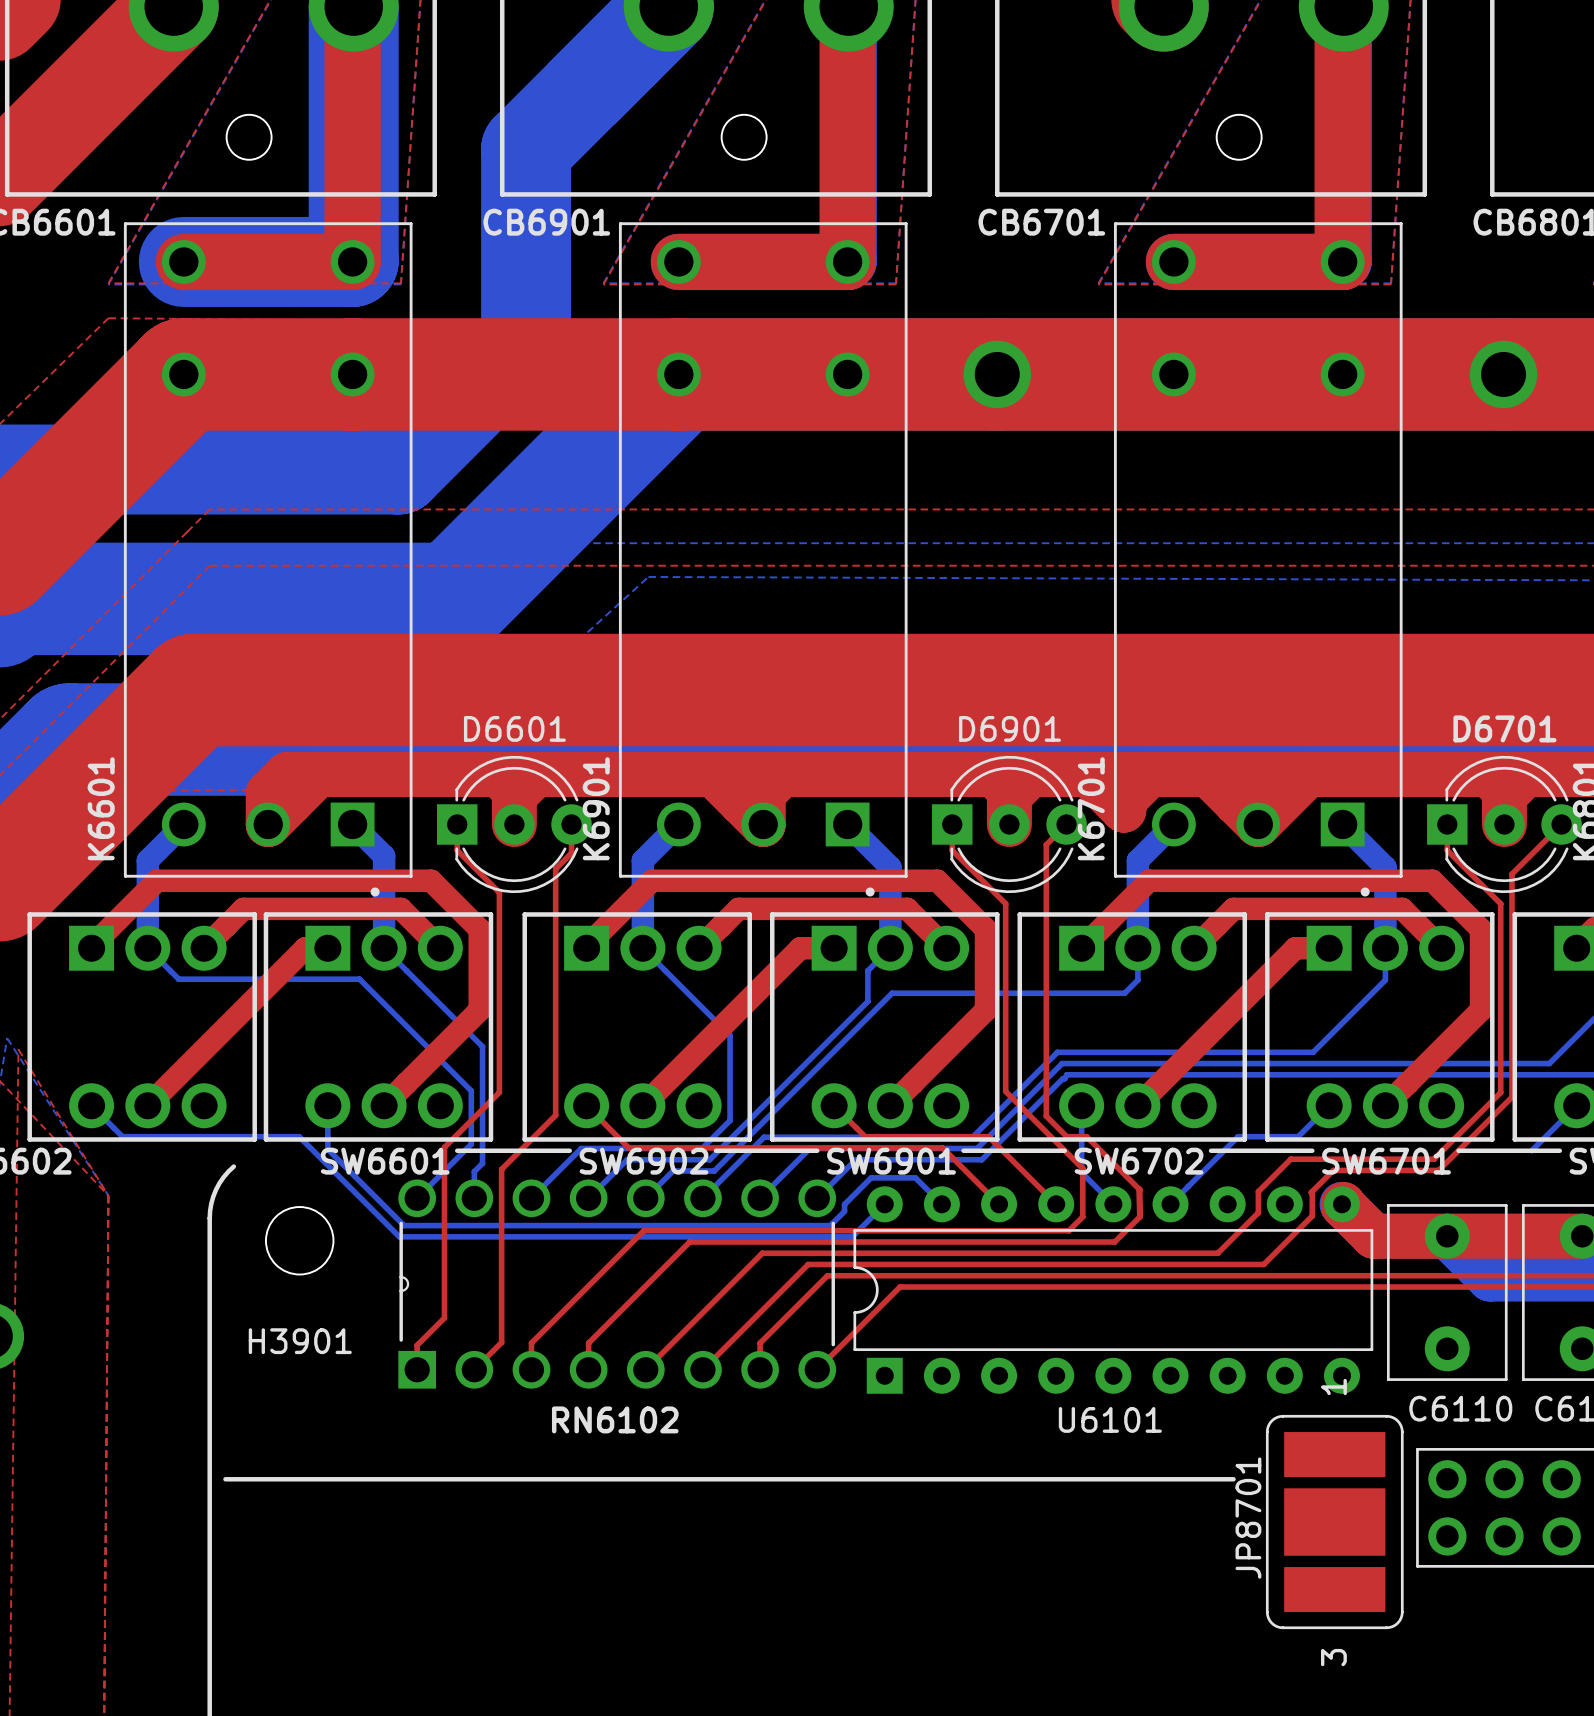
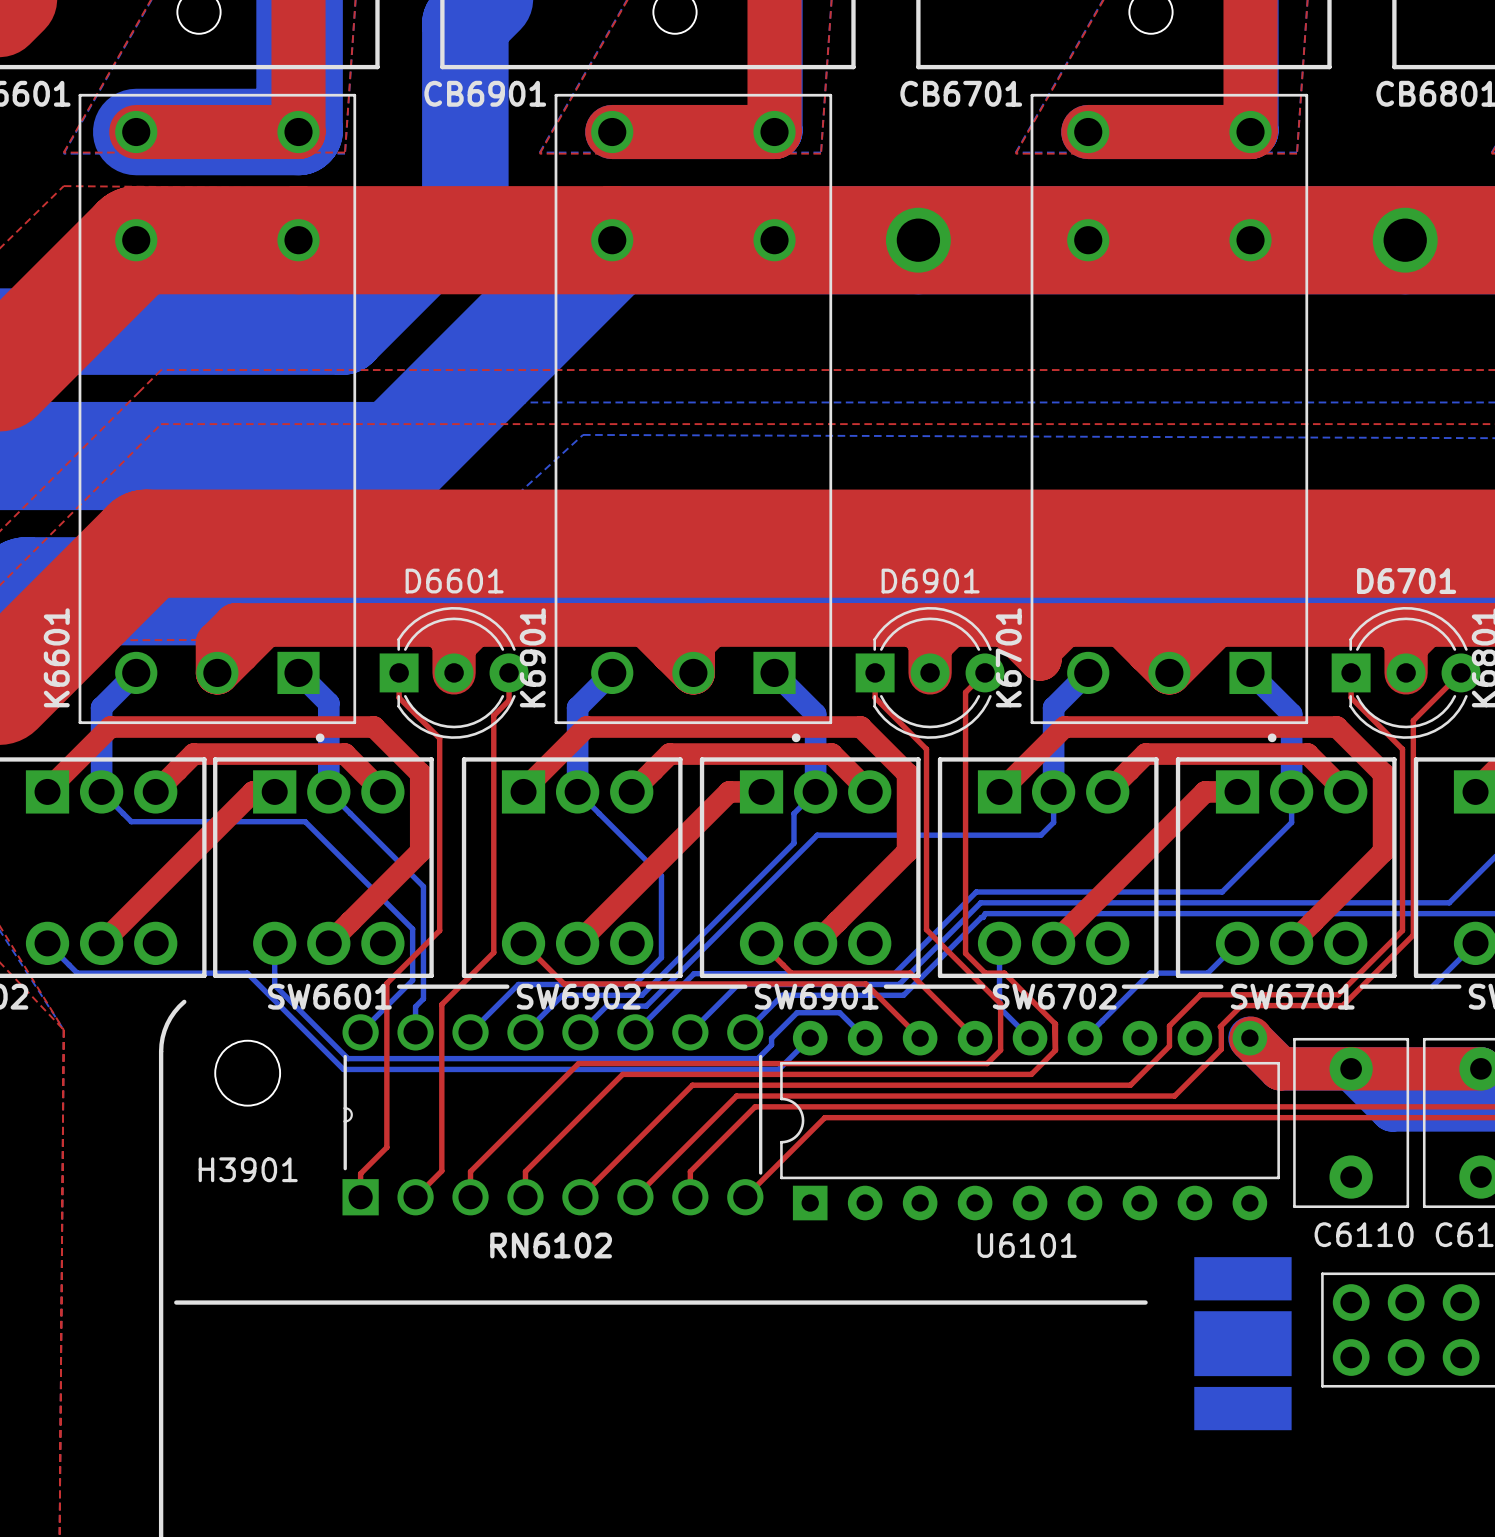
JP8701 side: top (1334, 1522) -> bottom (1242, 1343)

